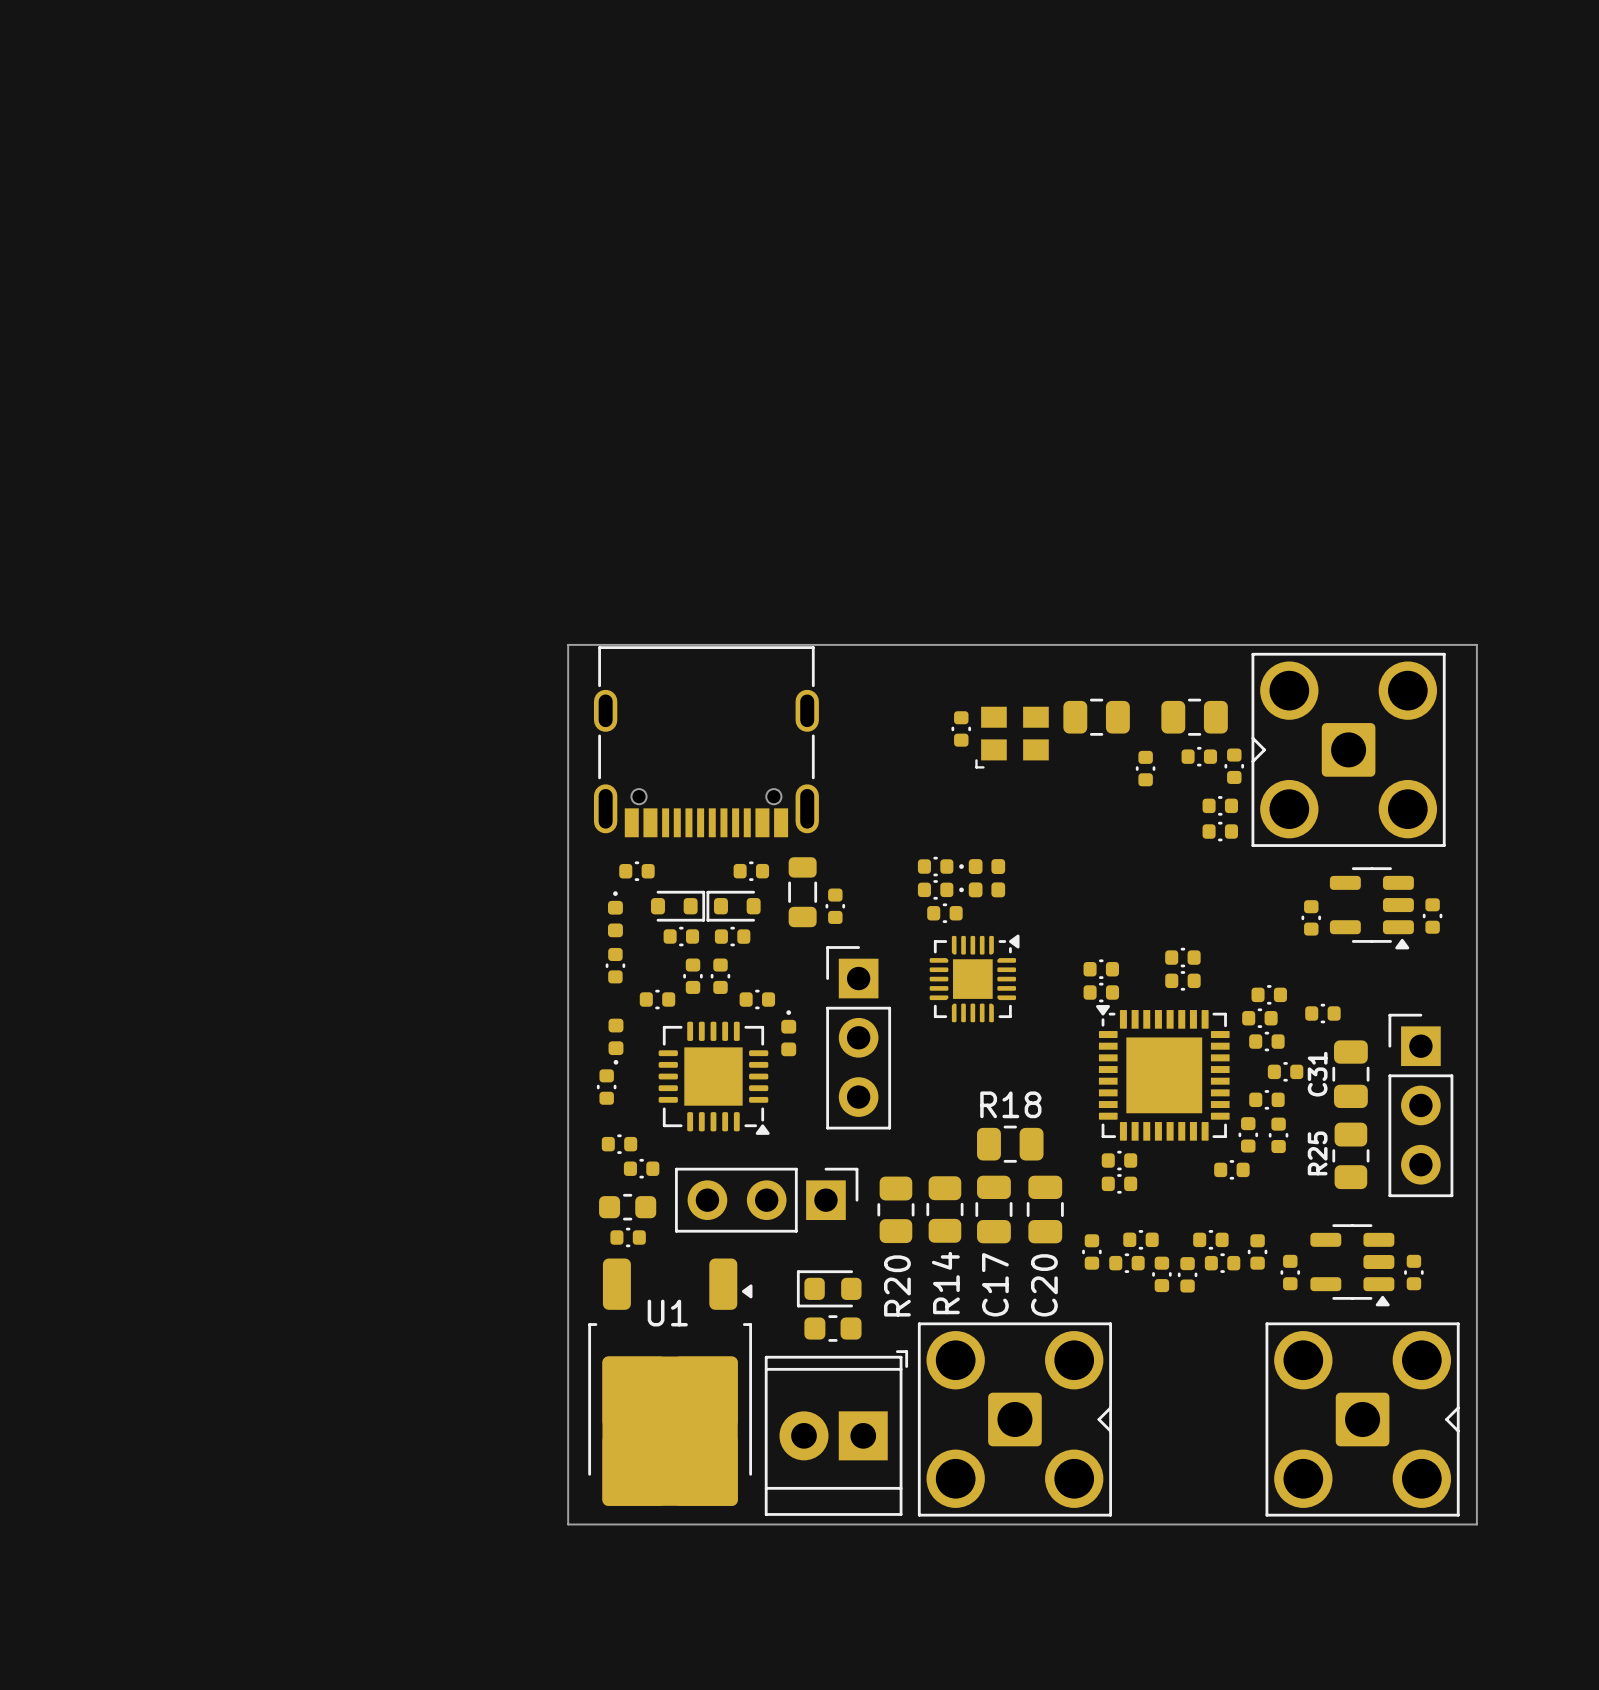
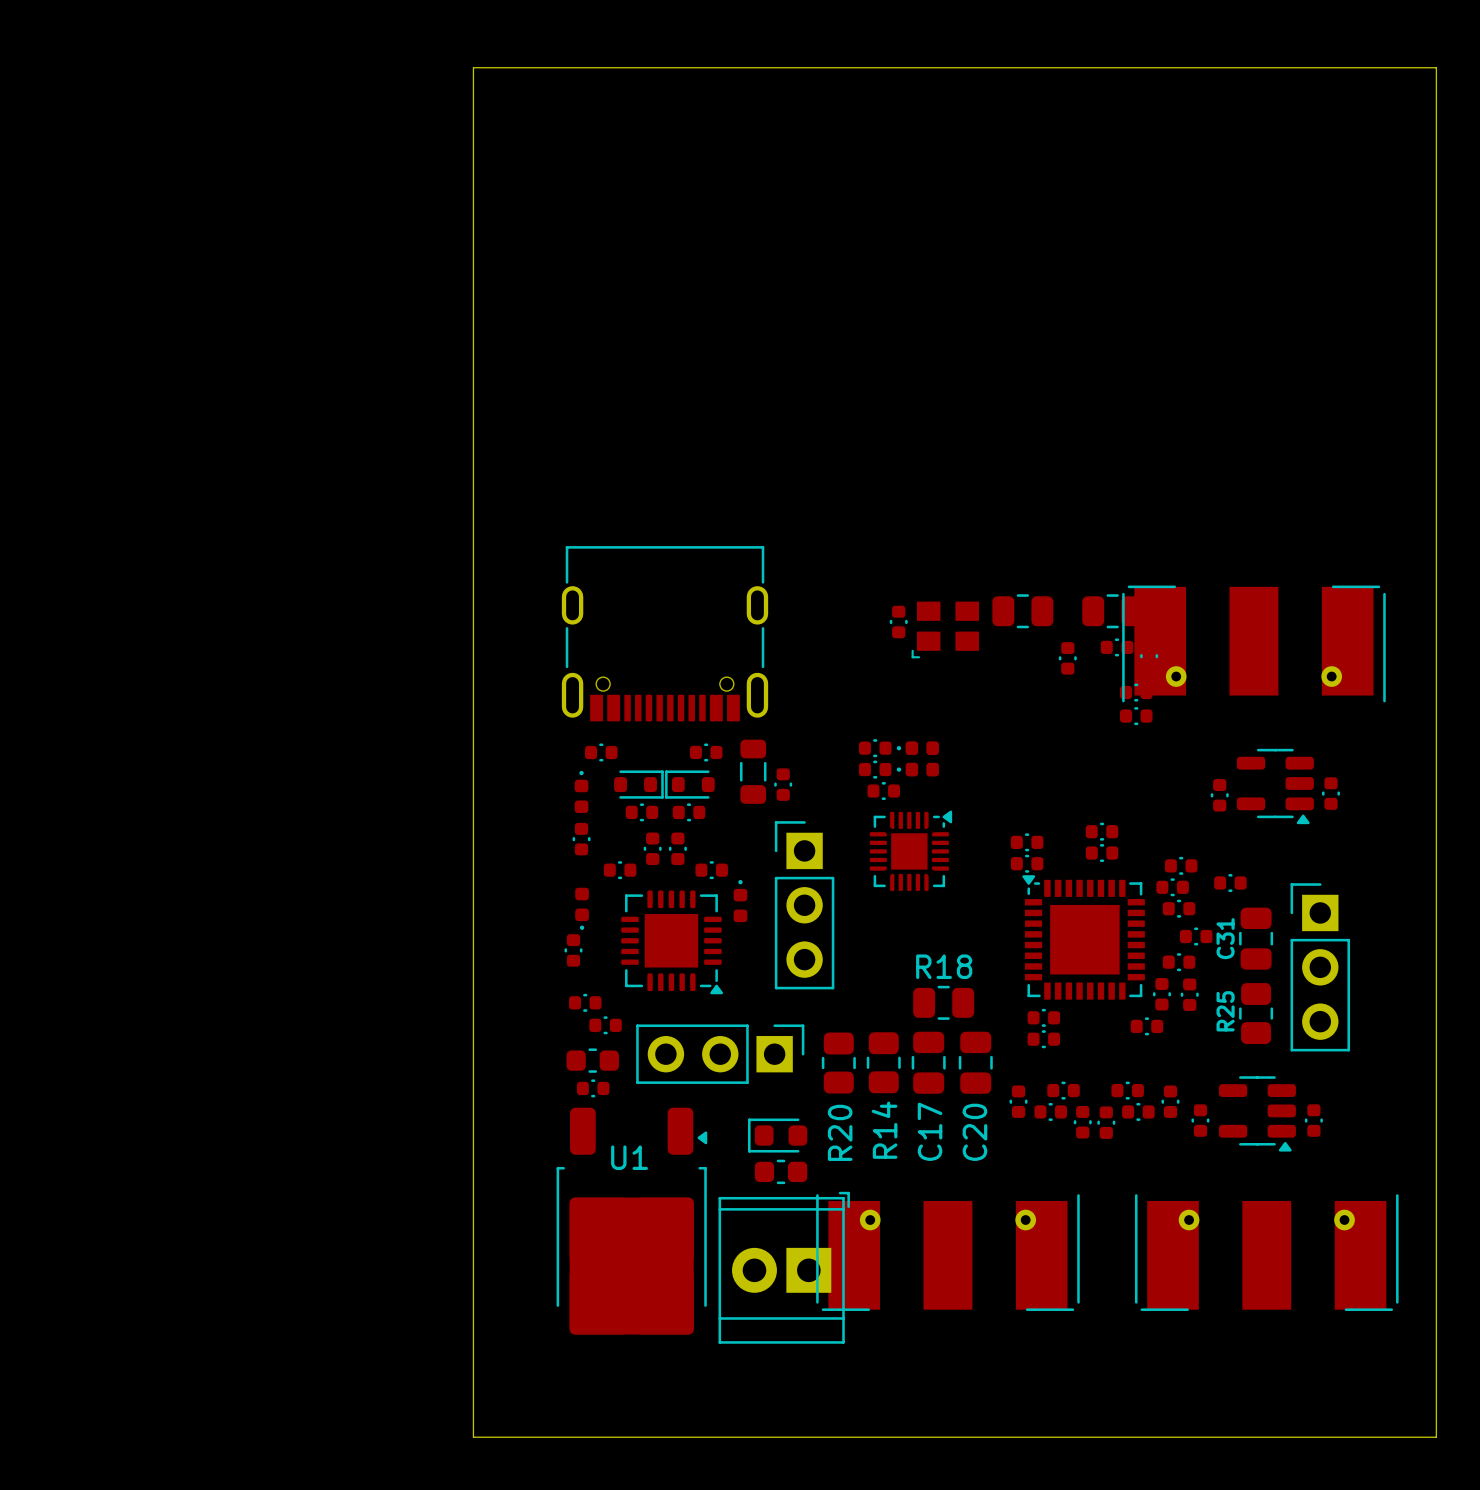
board edge: (568, 644) (1476, 644) (1476, 1524) (568, 1524) (568, 644) -> (473, 67) (473, 1437) (1436, 1437) (1436, 67) (473, 67)
part footprint: [1251, 652, 1446, 847] -> [1122, 585, 1386, 703]
part footprint: [917, 1322, 1113, 1517] -> [816, 1194, 1080, 1311]
part footprint: [1265, 1322, 1460, 1517] -> [1134, 1194, 1399, 1311]

